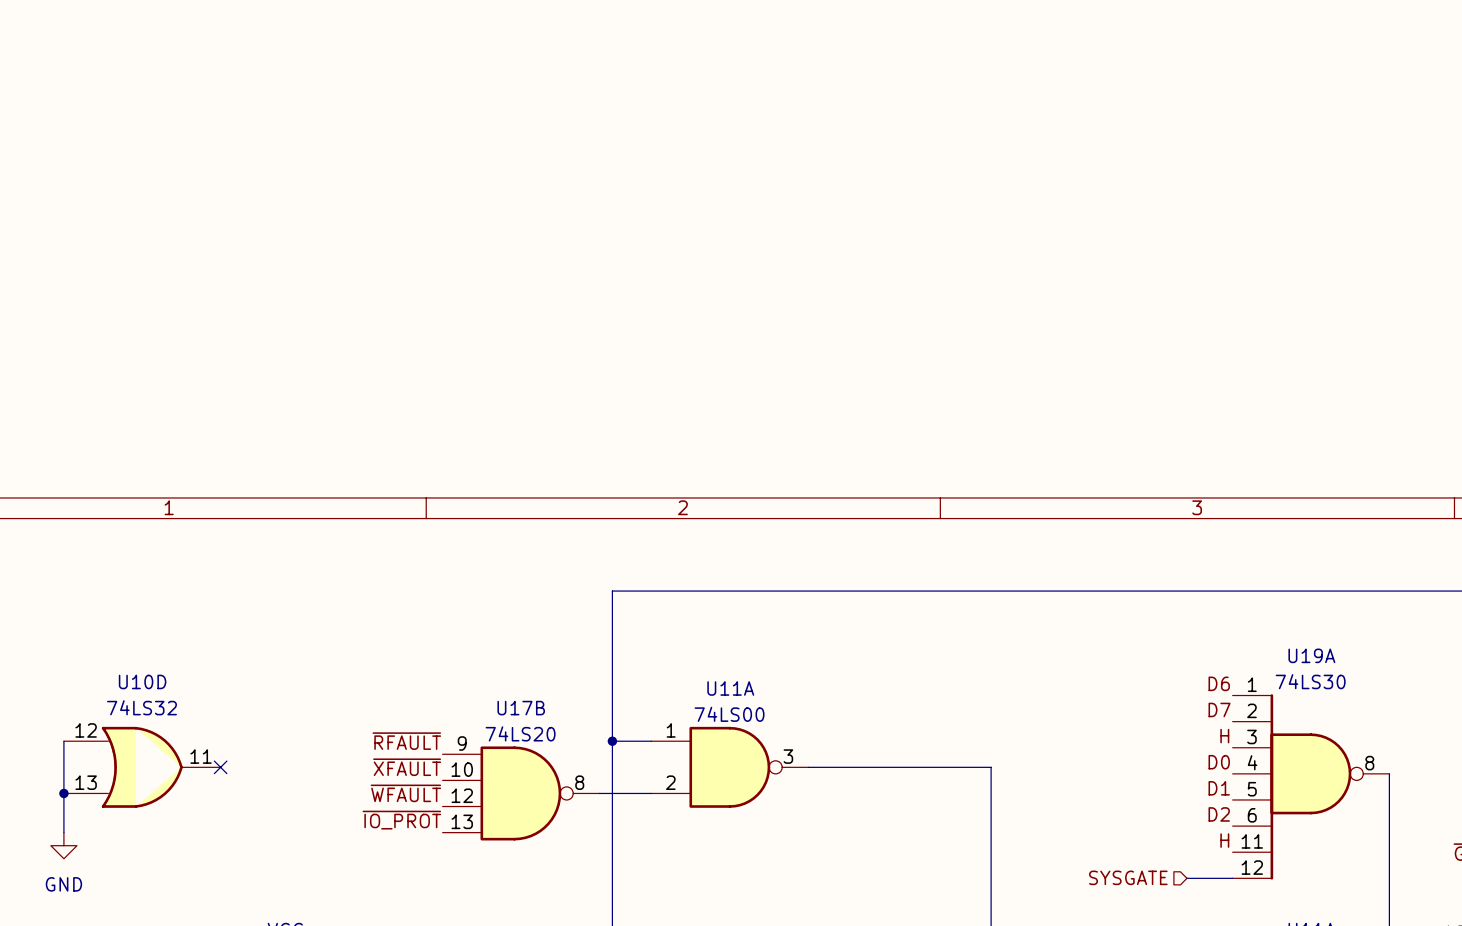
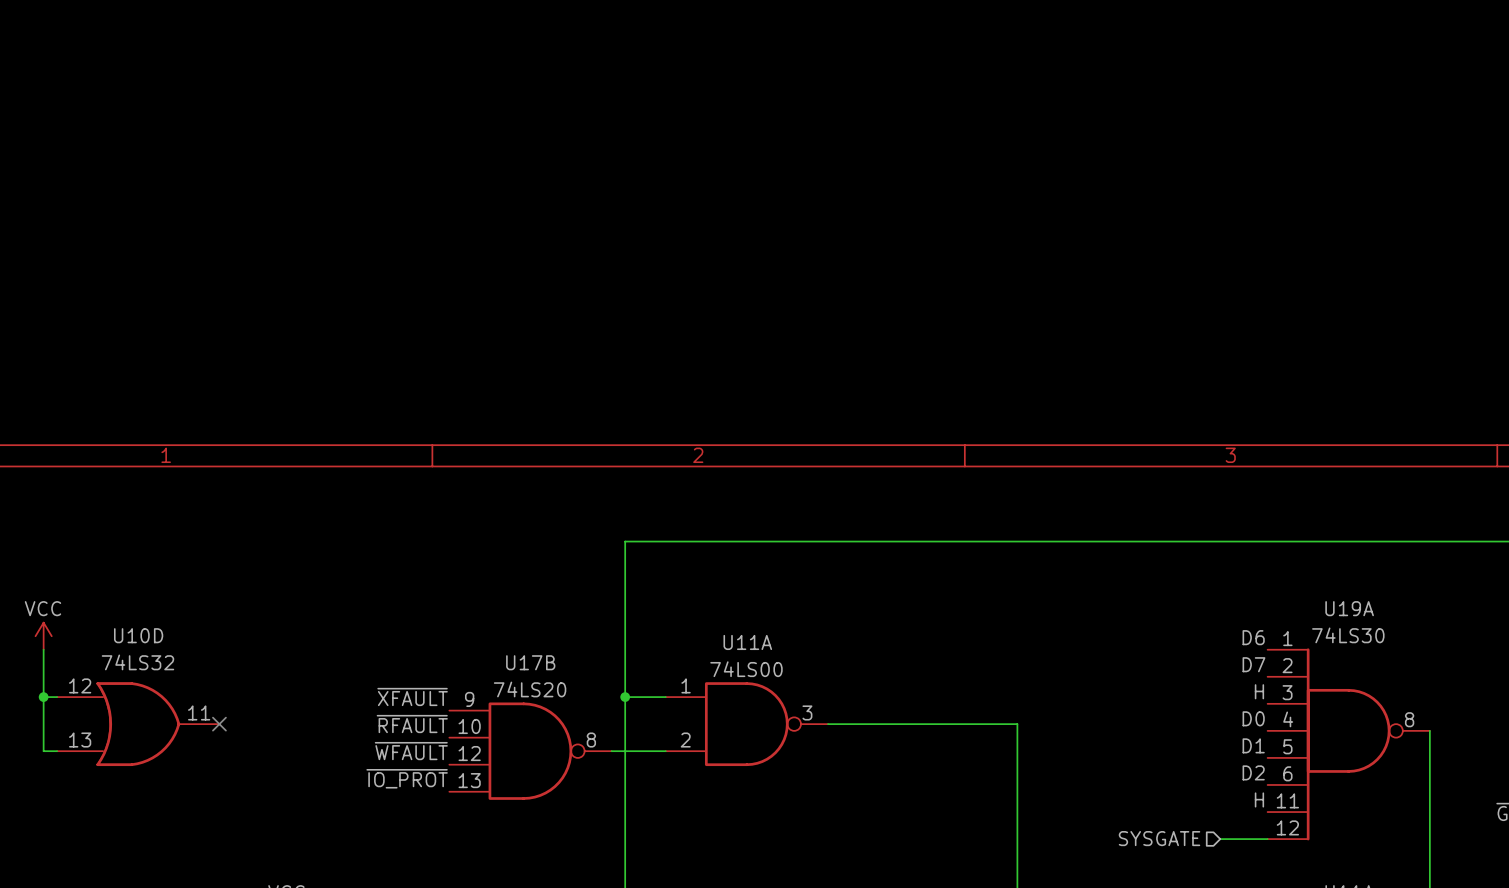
power symbol: none -> VCC (43, 636)
wire: none -> (43, 649) (43, 751) (57, 751)
wire: (63, 741) (63, 832) -> (57, 697) (43, 697)
label: ~{RFAULT} (406, 741) -> ~{XFAULT} (412, 696)
label: ~{XFAULT} (407, 767) -> ~{RFAULT} (412, 724)
junction position: (63, 793) -> (43, 697)
power symbol: GND (63, 845) -> none

